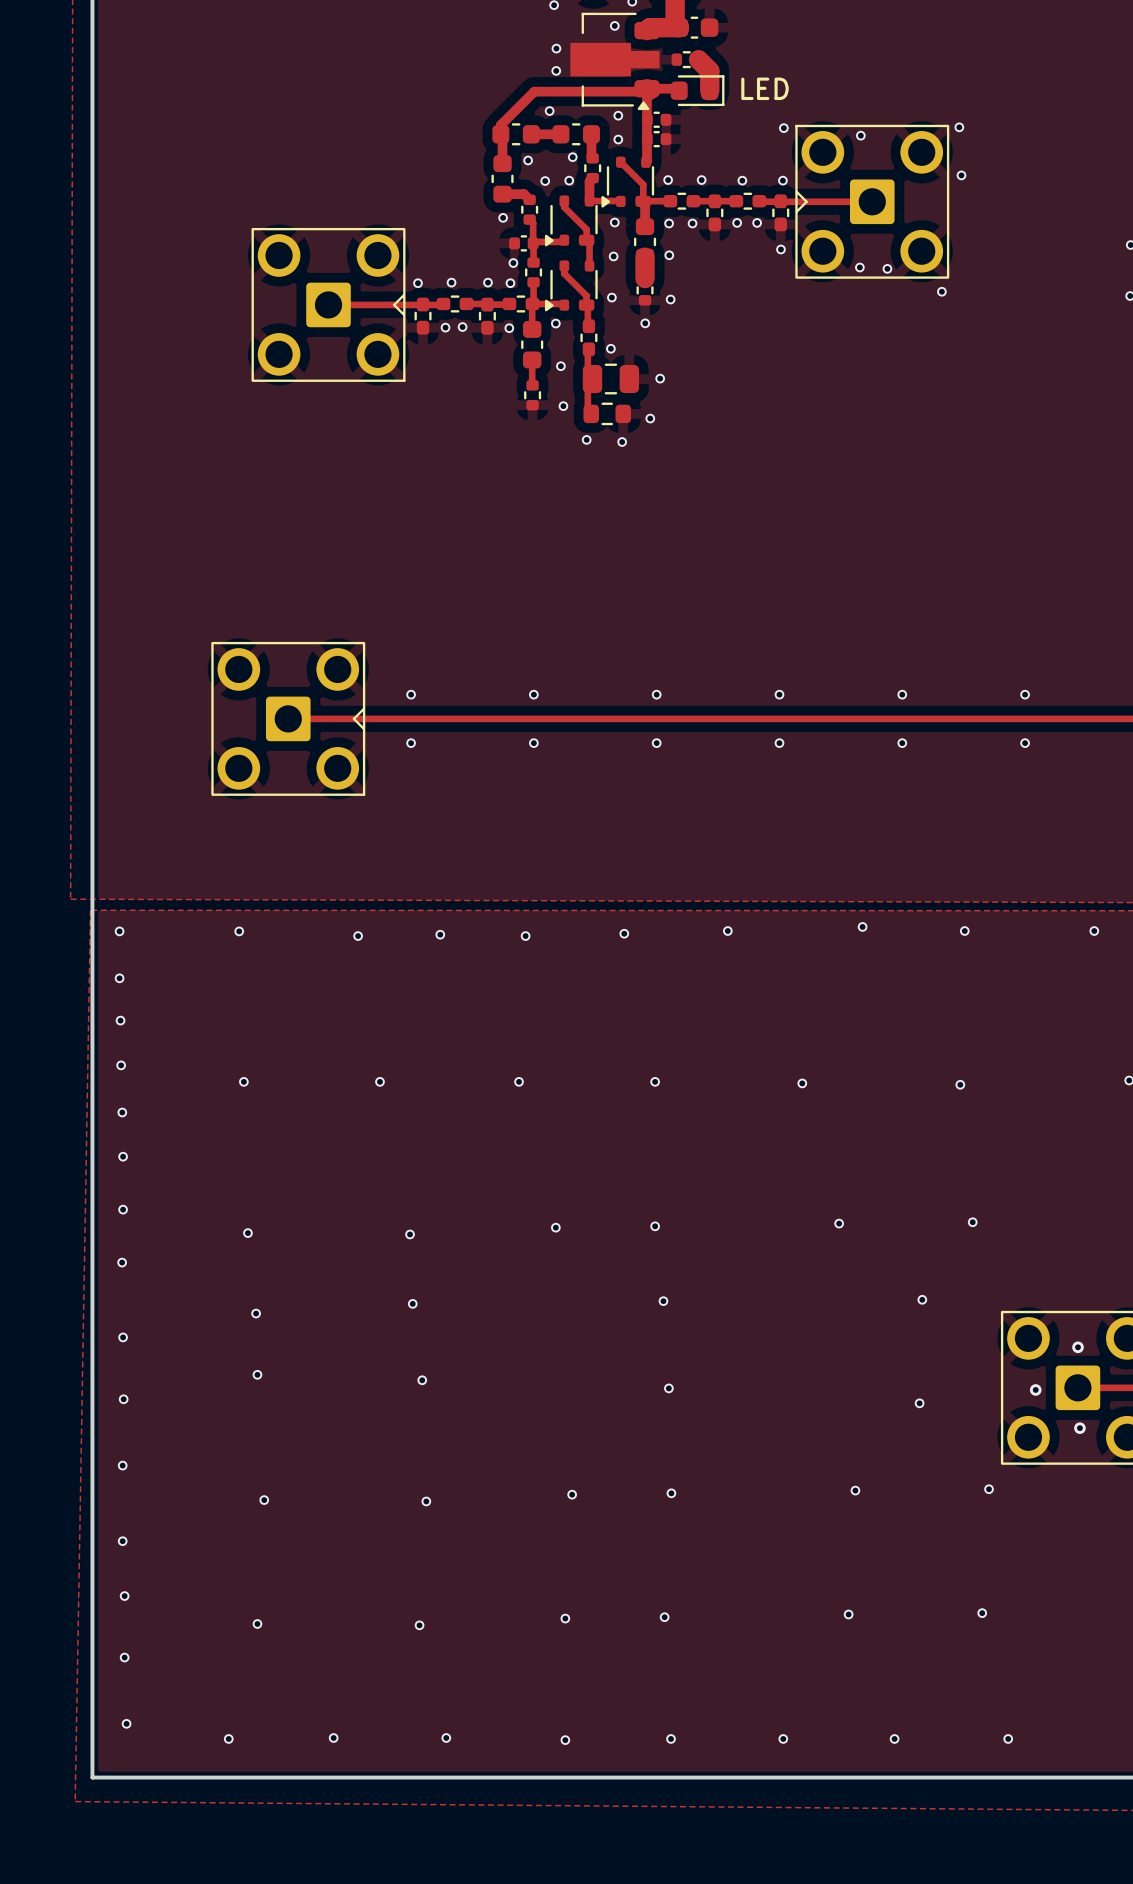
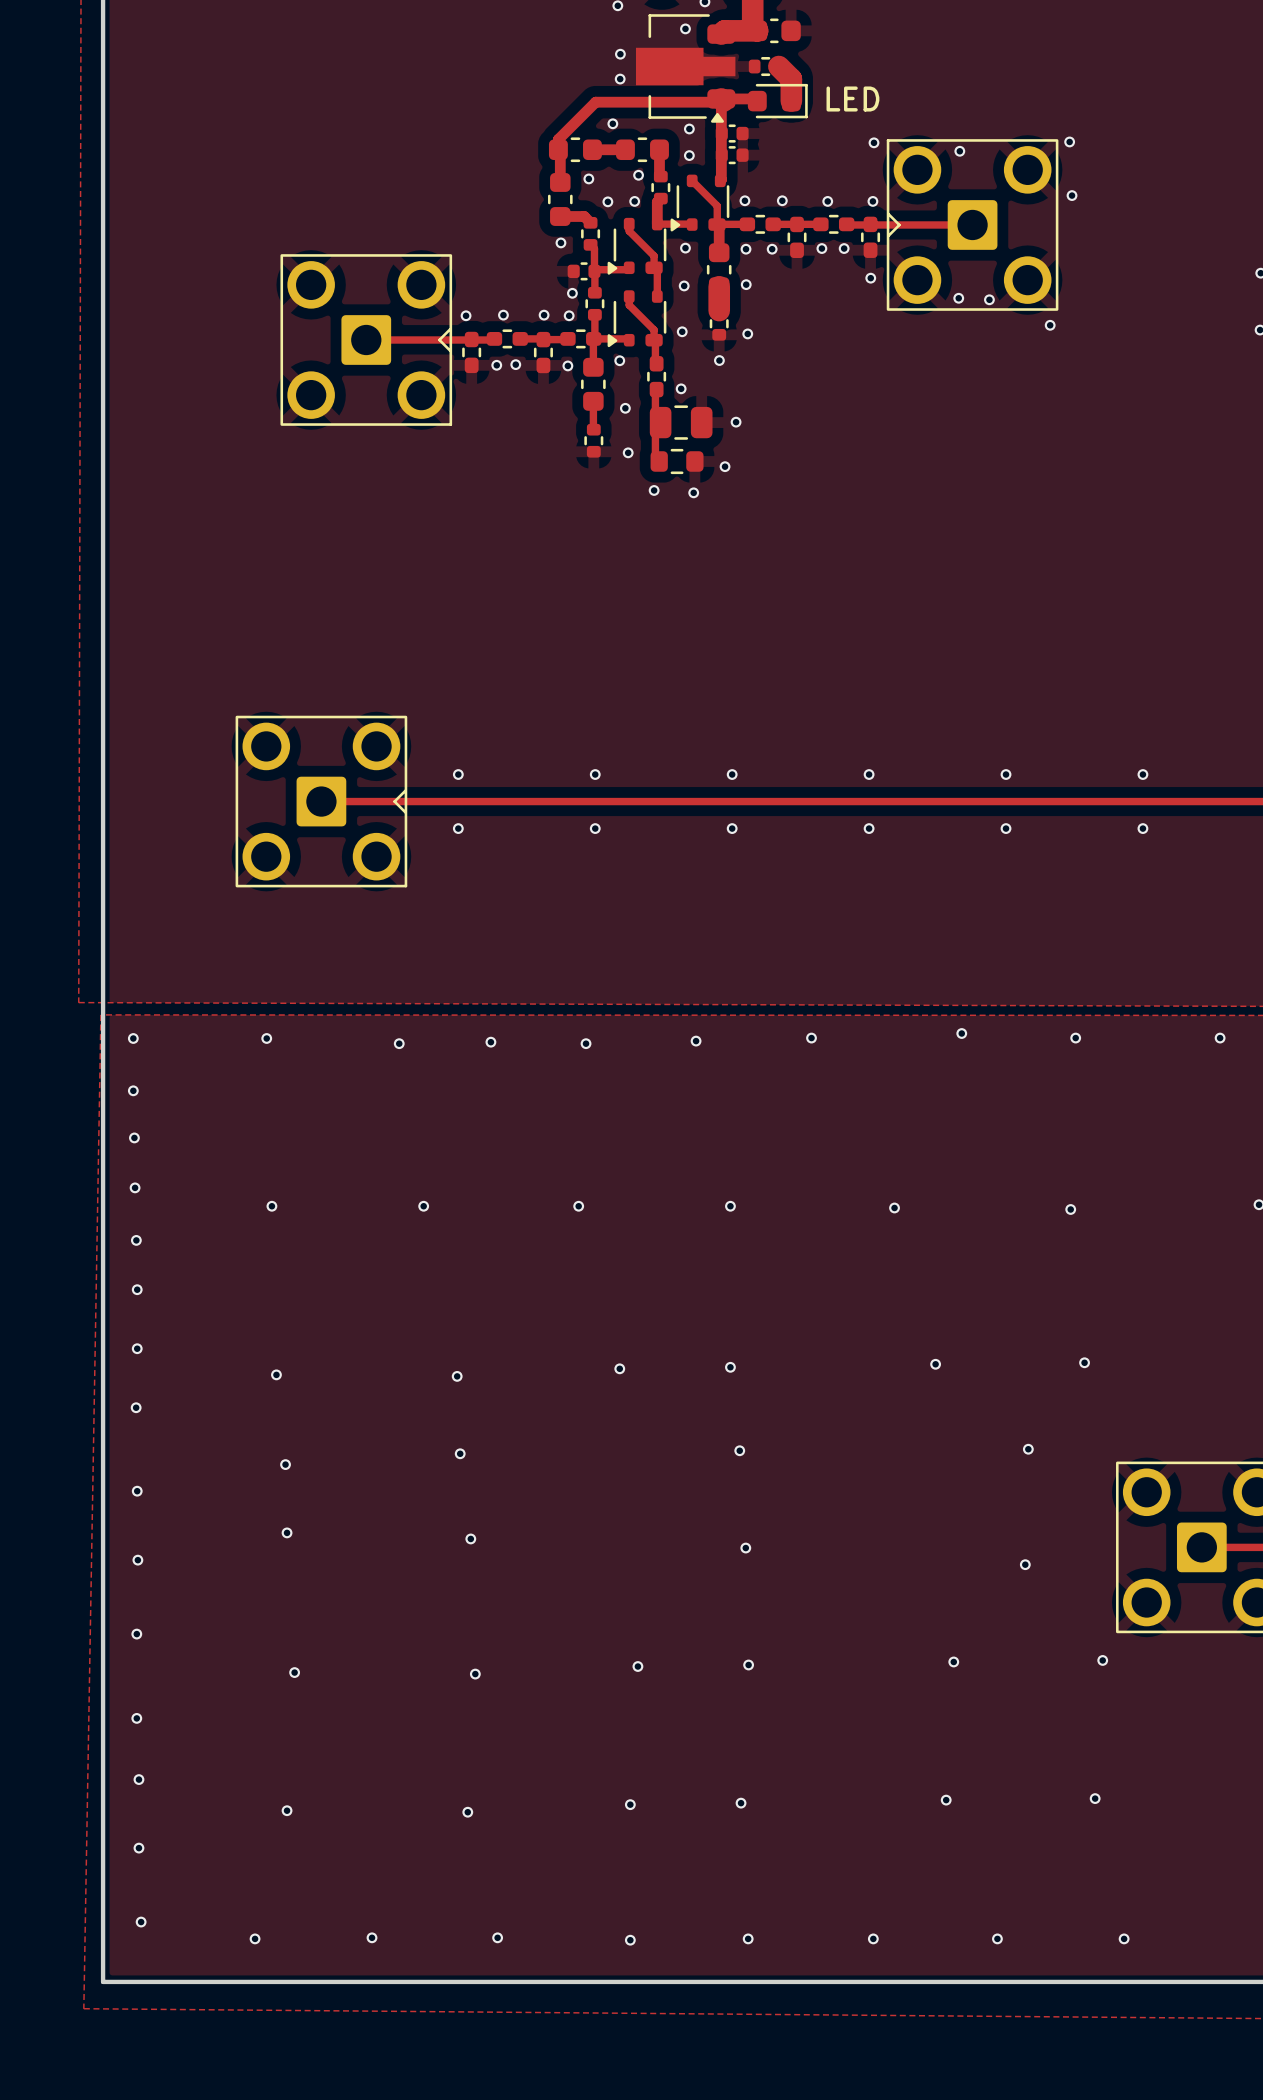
via: (1078, 1347) -> none
via: (1035, 1389) -> none
via: (1079, 1428) -> none

